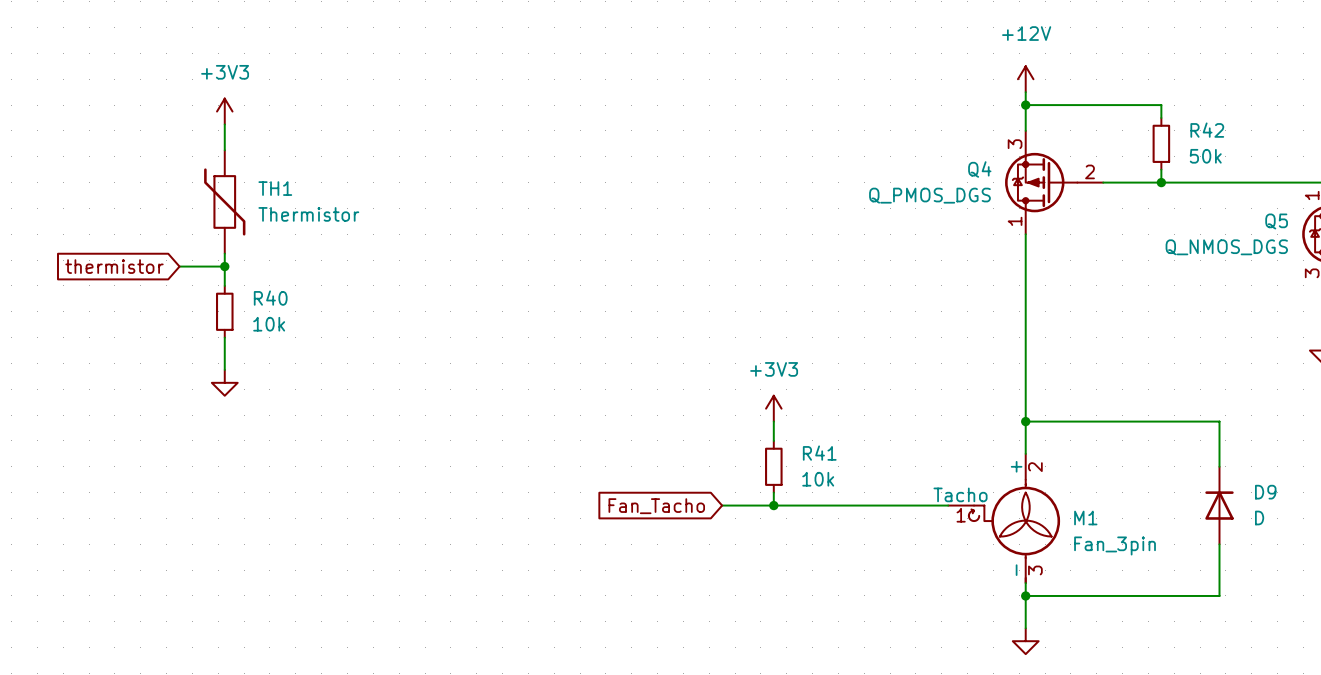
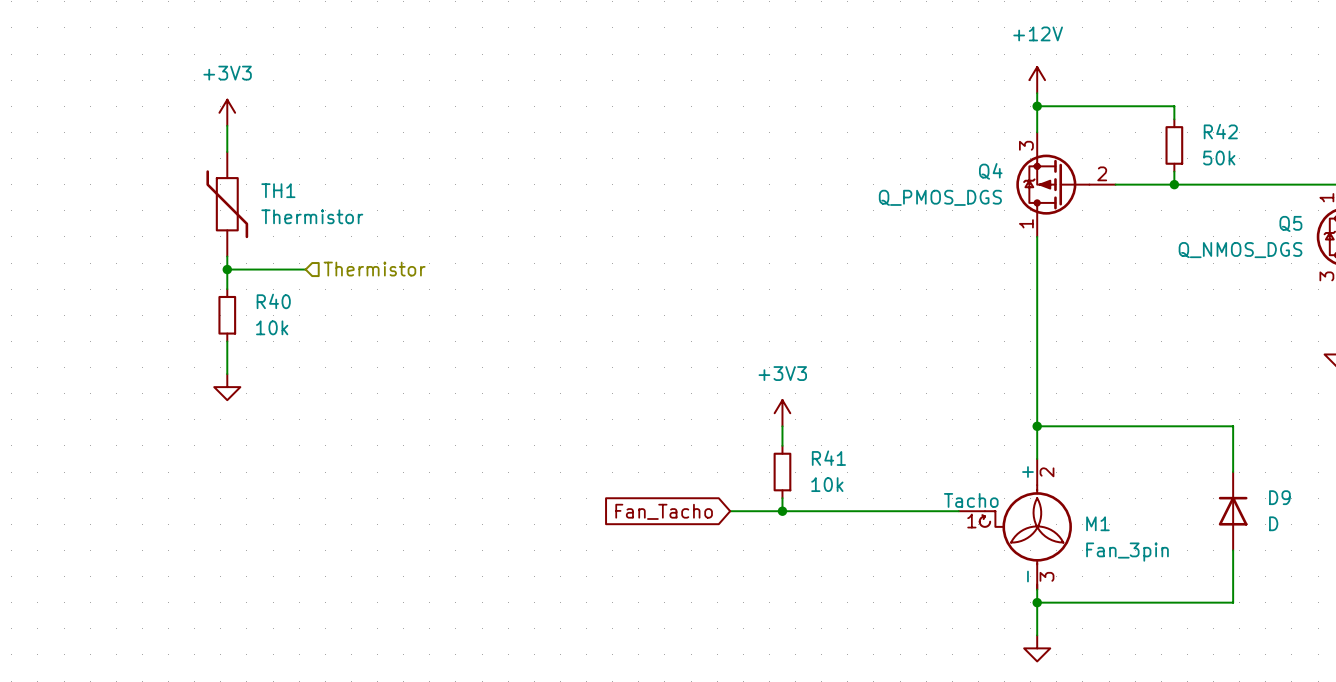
global label: thermistor (114, 266) -> none
wire: (179, 266) (224, 266) -> (305, 269) (227, 269)
hierarchical label: none -> Thermistor (374, 269)

